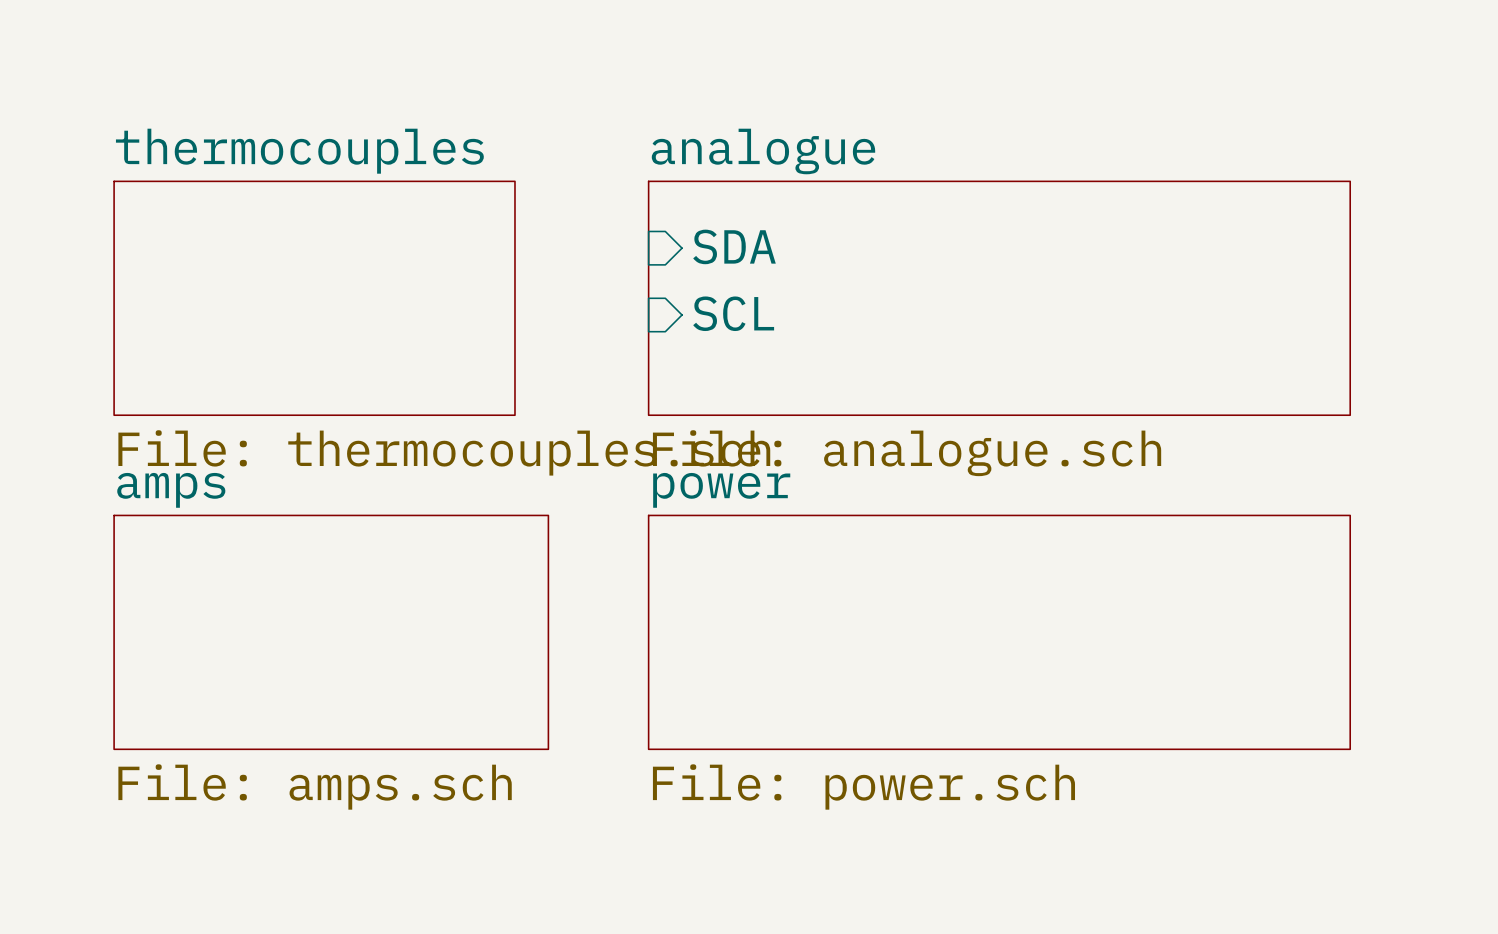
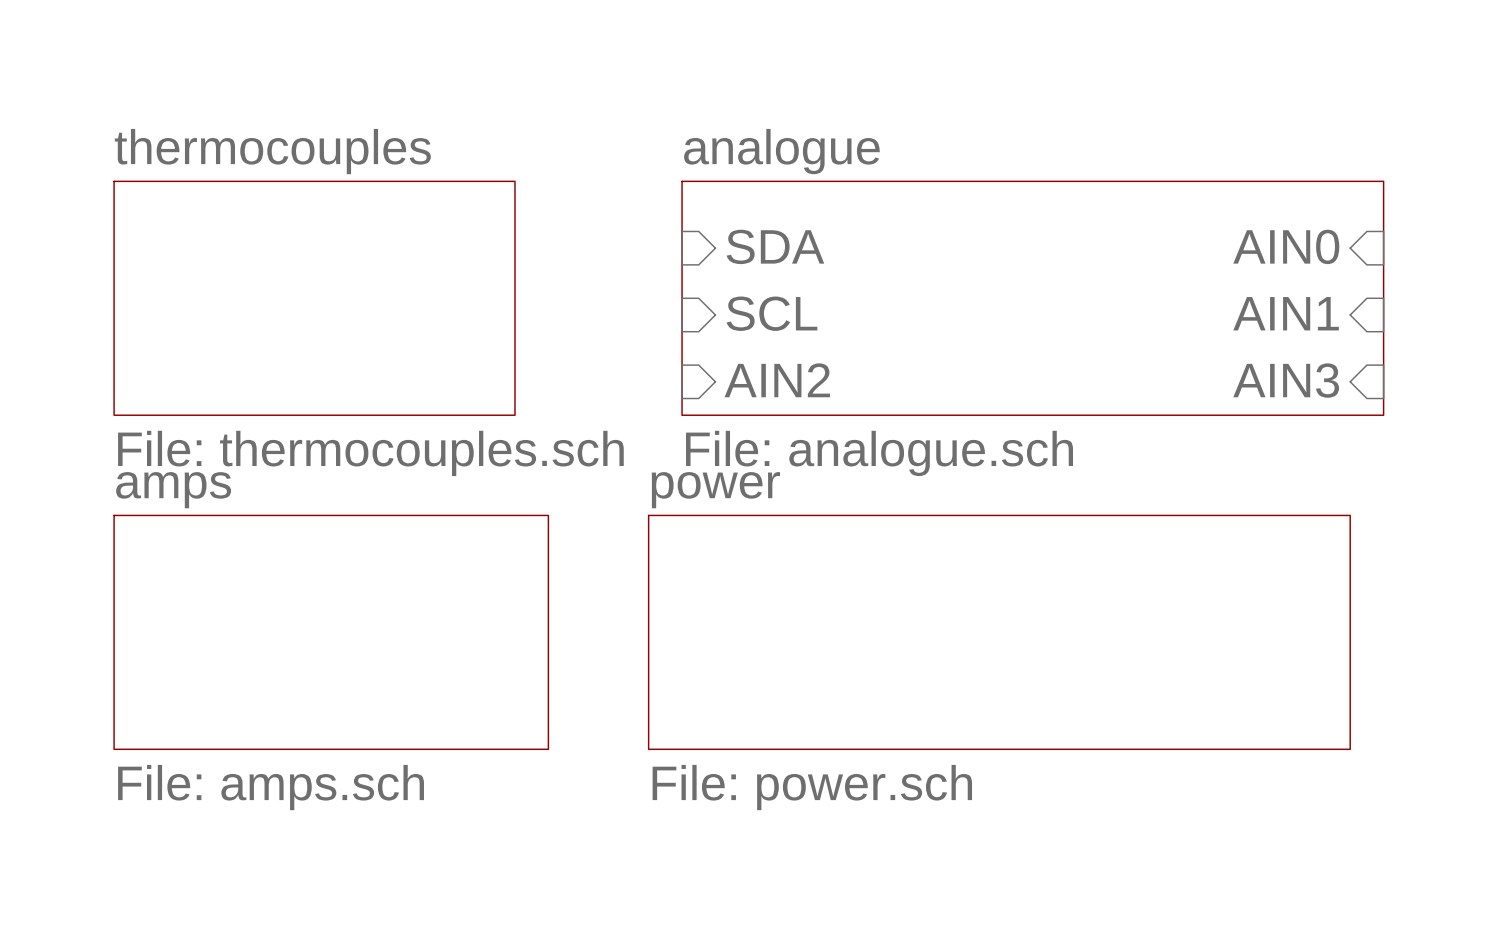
sheet pin position: SDA (734, 246) -> SDA (775, 246)
sheet pin: none -> AIN0 (1286, 246)
sheet analogue position: (999, 298) -> (1032, 298)
sheet pin position: SCL (733, 313) -> SCL (771, 313)
sheet pin: none -> AIN1 (1286, 313)
sheet pin: none -> AIN2 (777, 380)
sheet pin: none -> AIN3 (1286, 380)

